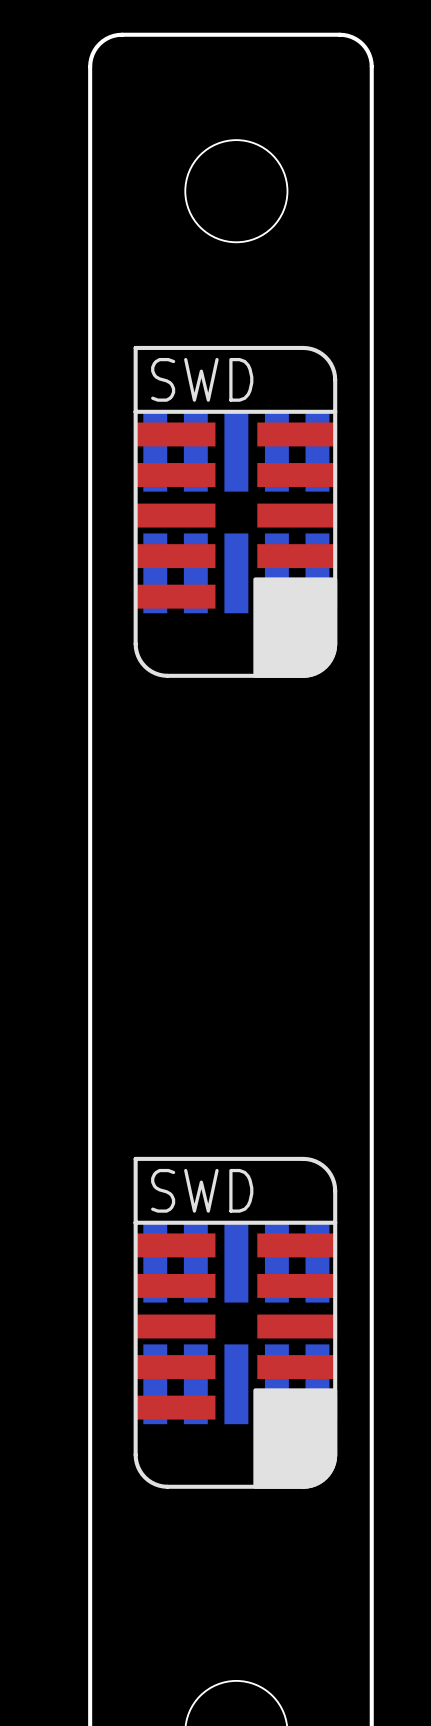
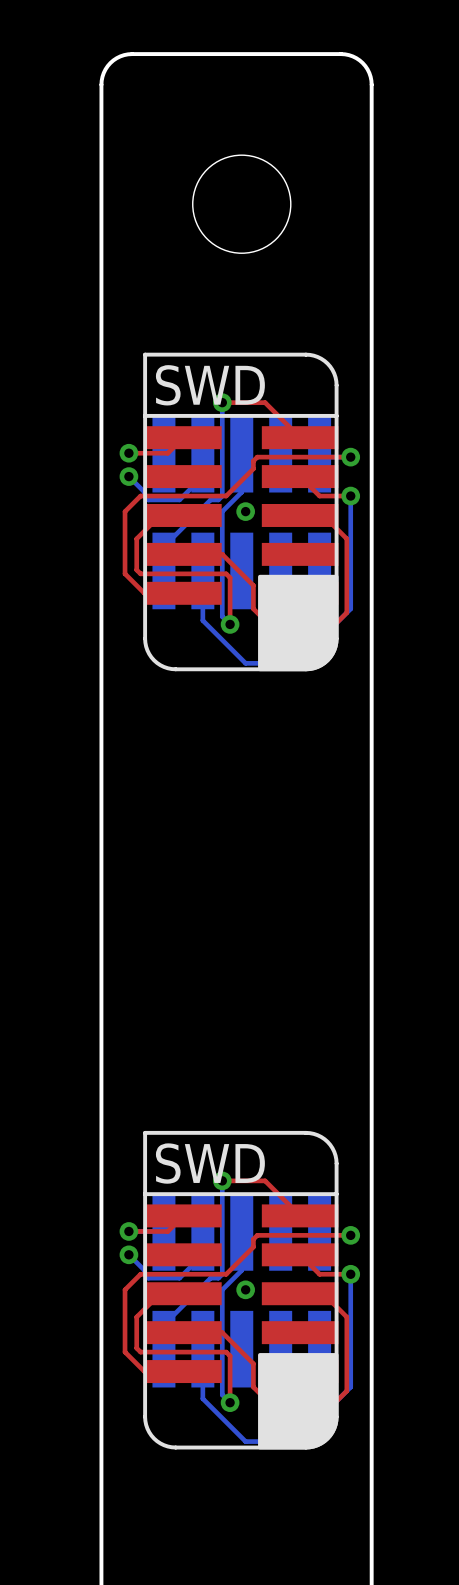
top track: none -> (222, 402) (265, 402) (300, 437)
bottom track: none -> (222, 402) (222, 496) (218, 499) (210, 499) (163, 546) (163, 570)
via: none -> (222, 402)
top track: none -> (183, 437) (167, 453) (128, 453)
via: none -> (128, 453)
bottom track: none -> (202, 454) (202, 476) (179, 499) (148, 499) (144, 496) (144, 492) (128, 476)
bottom track: none -> (241, 454) (241, 492) (222, 511) (222, 616) (230, 624)
top track: none -> (350, 457) (257, 457) (253, 461) (253, 468) (226, 496) (140, 496) (125, 511) (125, 573) (144, 593) (183, 593)
via: none -> (350, 457)
via: none -> (128, 476)
top track: none -> (300, 476) (319, 496) (350, 496)
bottom track: none -> (350, 496) (350, 608) (296, 663) (245, 663) (202, 620) (202, 570)
via: none -> (350, 496)
via: none -> (245, 511)
top track: none -> (183, 515) (160, 515) (136, 538) (136, 569) (140, 573) (226, 573) (230, 577) (230, 624)
top track: none -> (300, 515) (323, 515) (346, 538) (346, 612) (315, 643) (272, 643)
top track: none -> (183, 554) (222, 554) (253, 585) (253, 608) (269, 624) (288, 624)
via: none -> (230, 624)
top track: none -> (222, 1180) (265, 1180) (300, 1215)
bottom track: none -> (222, 1180) (222, 1274) (218, 1278) (210, 1278) (163, 1324) (163, 1349)
via: none -> (222, 1180)
top track: none -> (183, 1215) (167, 1231) (128, 1231)
via: none -> (128, 1231)
bottom track: none -> (202, 1232) (202, 1254) (179, 1278) (148, 1278) (144, 1274) (144, 1270) (128, 1254)
bottom track: none -> (241, 1232) (241, 1270) (222, 1289) (222, 1394) (230, 1402)
top track: none -> (350, 1235) (257, 1235) (253, 1239) (253, 1247) (226, 1274) (140, 1274) (125, 1289) (125, 1352) (144, 1371) (183, 1371)
via: none -> (350, 1235)
via: none -> (128, 1254)
top track: none -> (300, 1254) (319, 1274) (350, 1274)
bottom track: none -> (350, 1274) (350, 1387) (296, 1441) (245, 1441) (202, 1398) (202, 1349)
via: none -> (350, 1274)
via: none -> (245, 1289)
top track: none -> (183, 1293) (160, 1293) (136, 1317) (136, 1348) (140, 1352) (226, 1352) (230, 1355) (230, 1402)
top track: none -> (300, 1293) (323, 1293) (346, 1317) (346, 1391) (315, 1422) (272, 1422)
top track: none -> (183, 1332) (222, 1332) (253, 1363) (253, 1387) (269, 1402) (288, 1402)
via: none -> (230, 1402)

